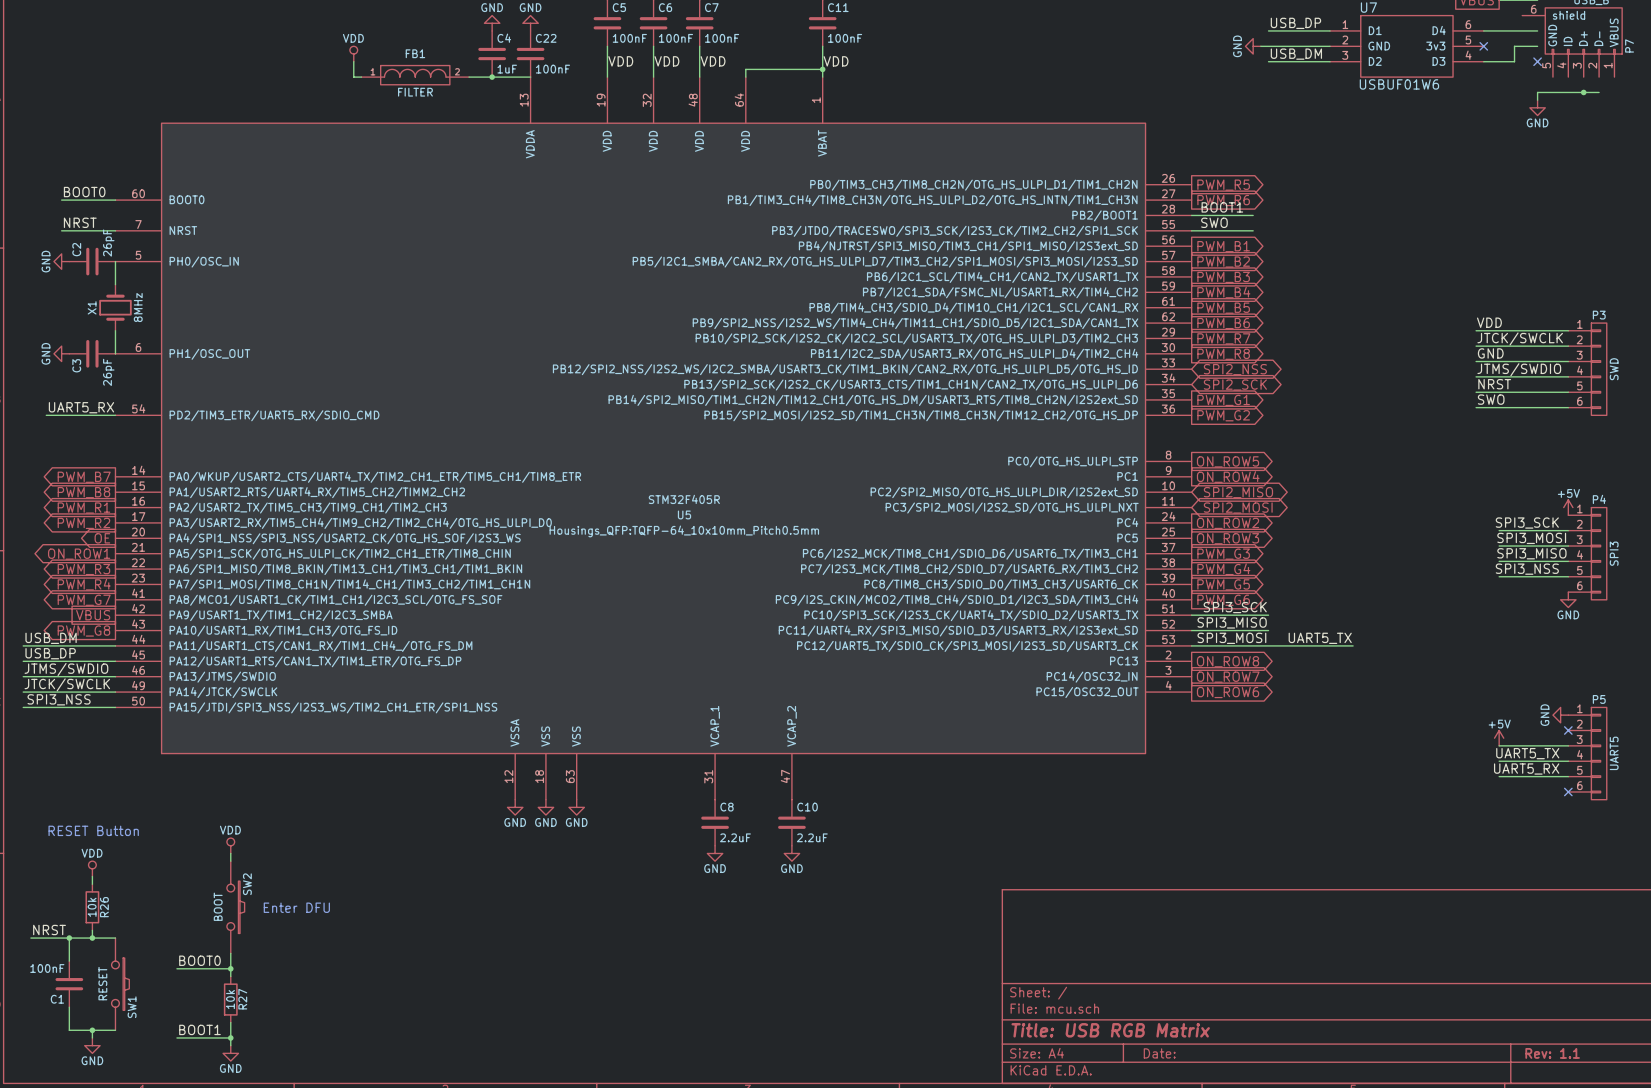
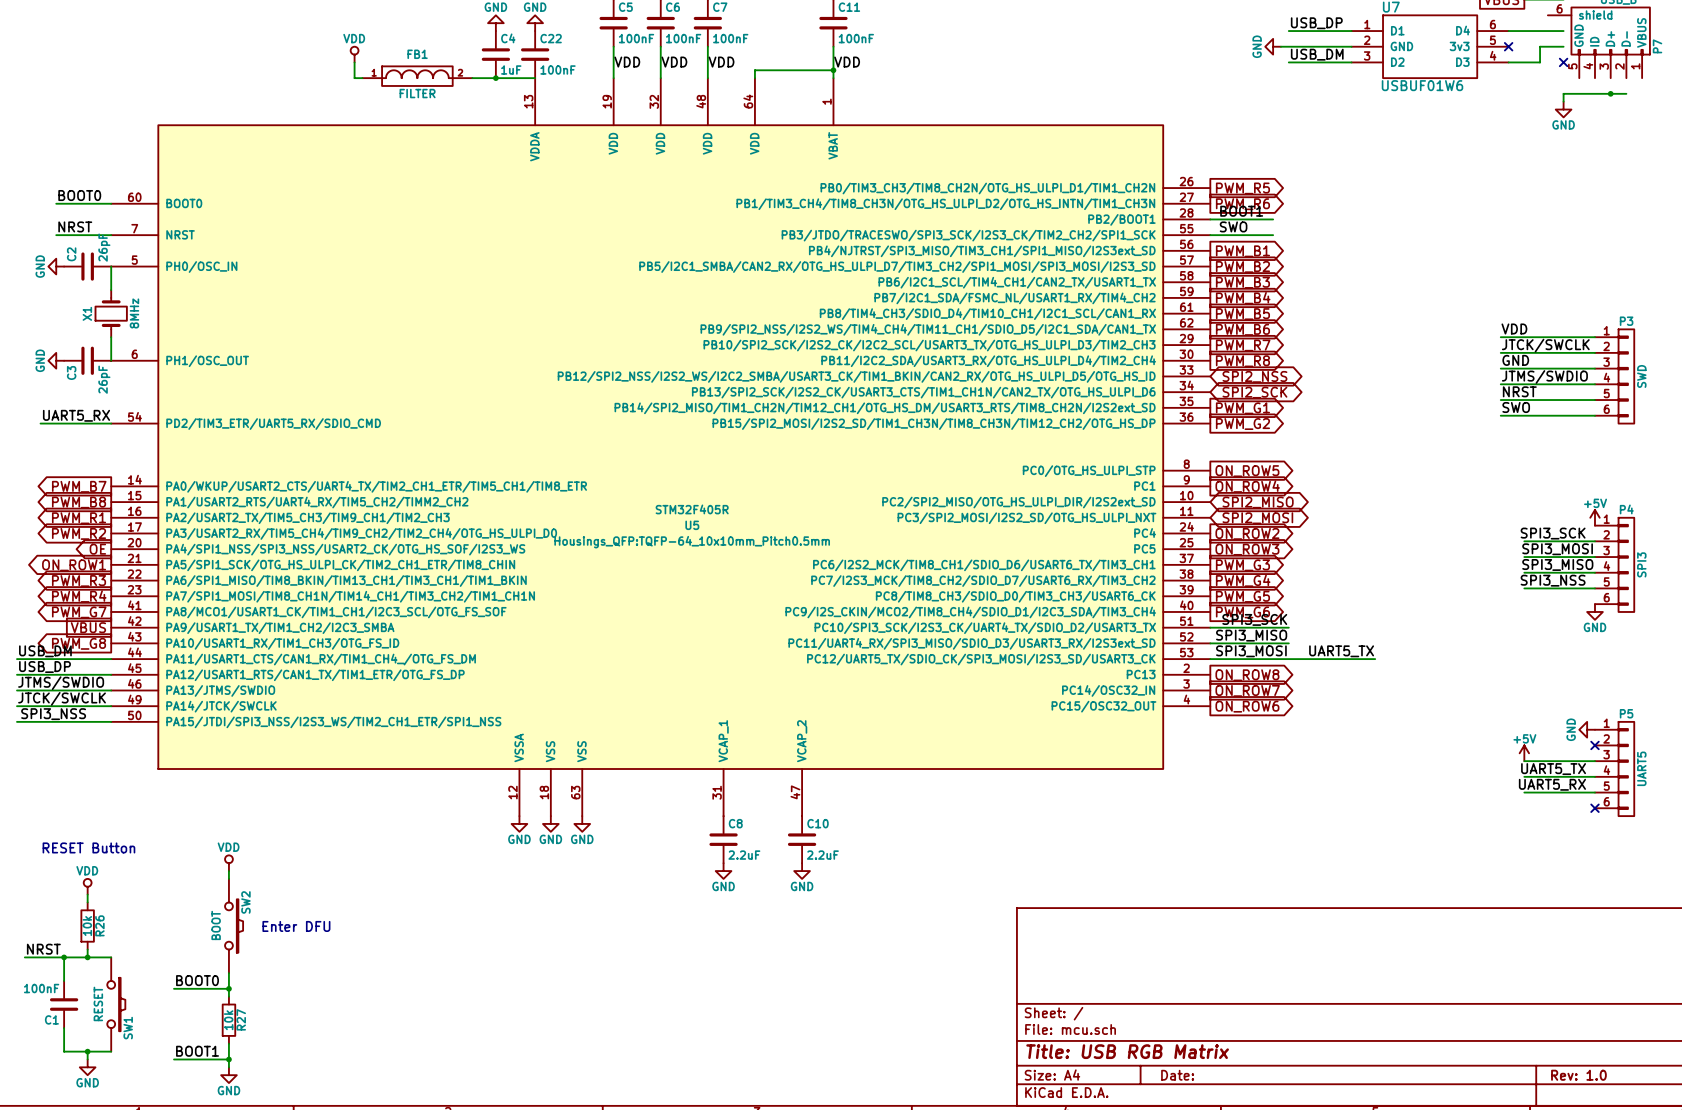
title block: Rev: 1.1 (1552, 1053) -> Rev: 1.0 (1578, 1075)

